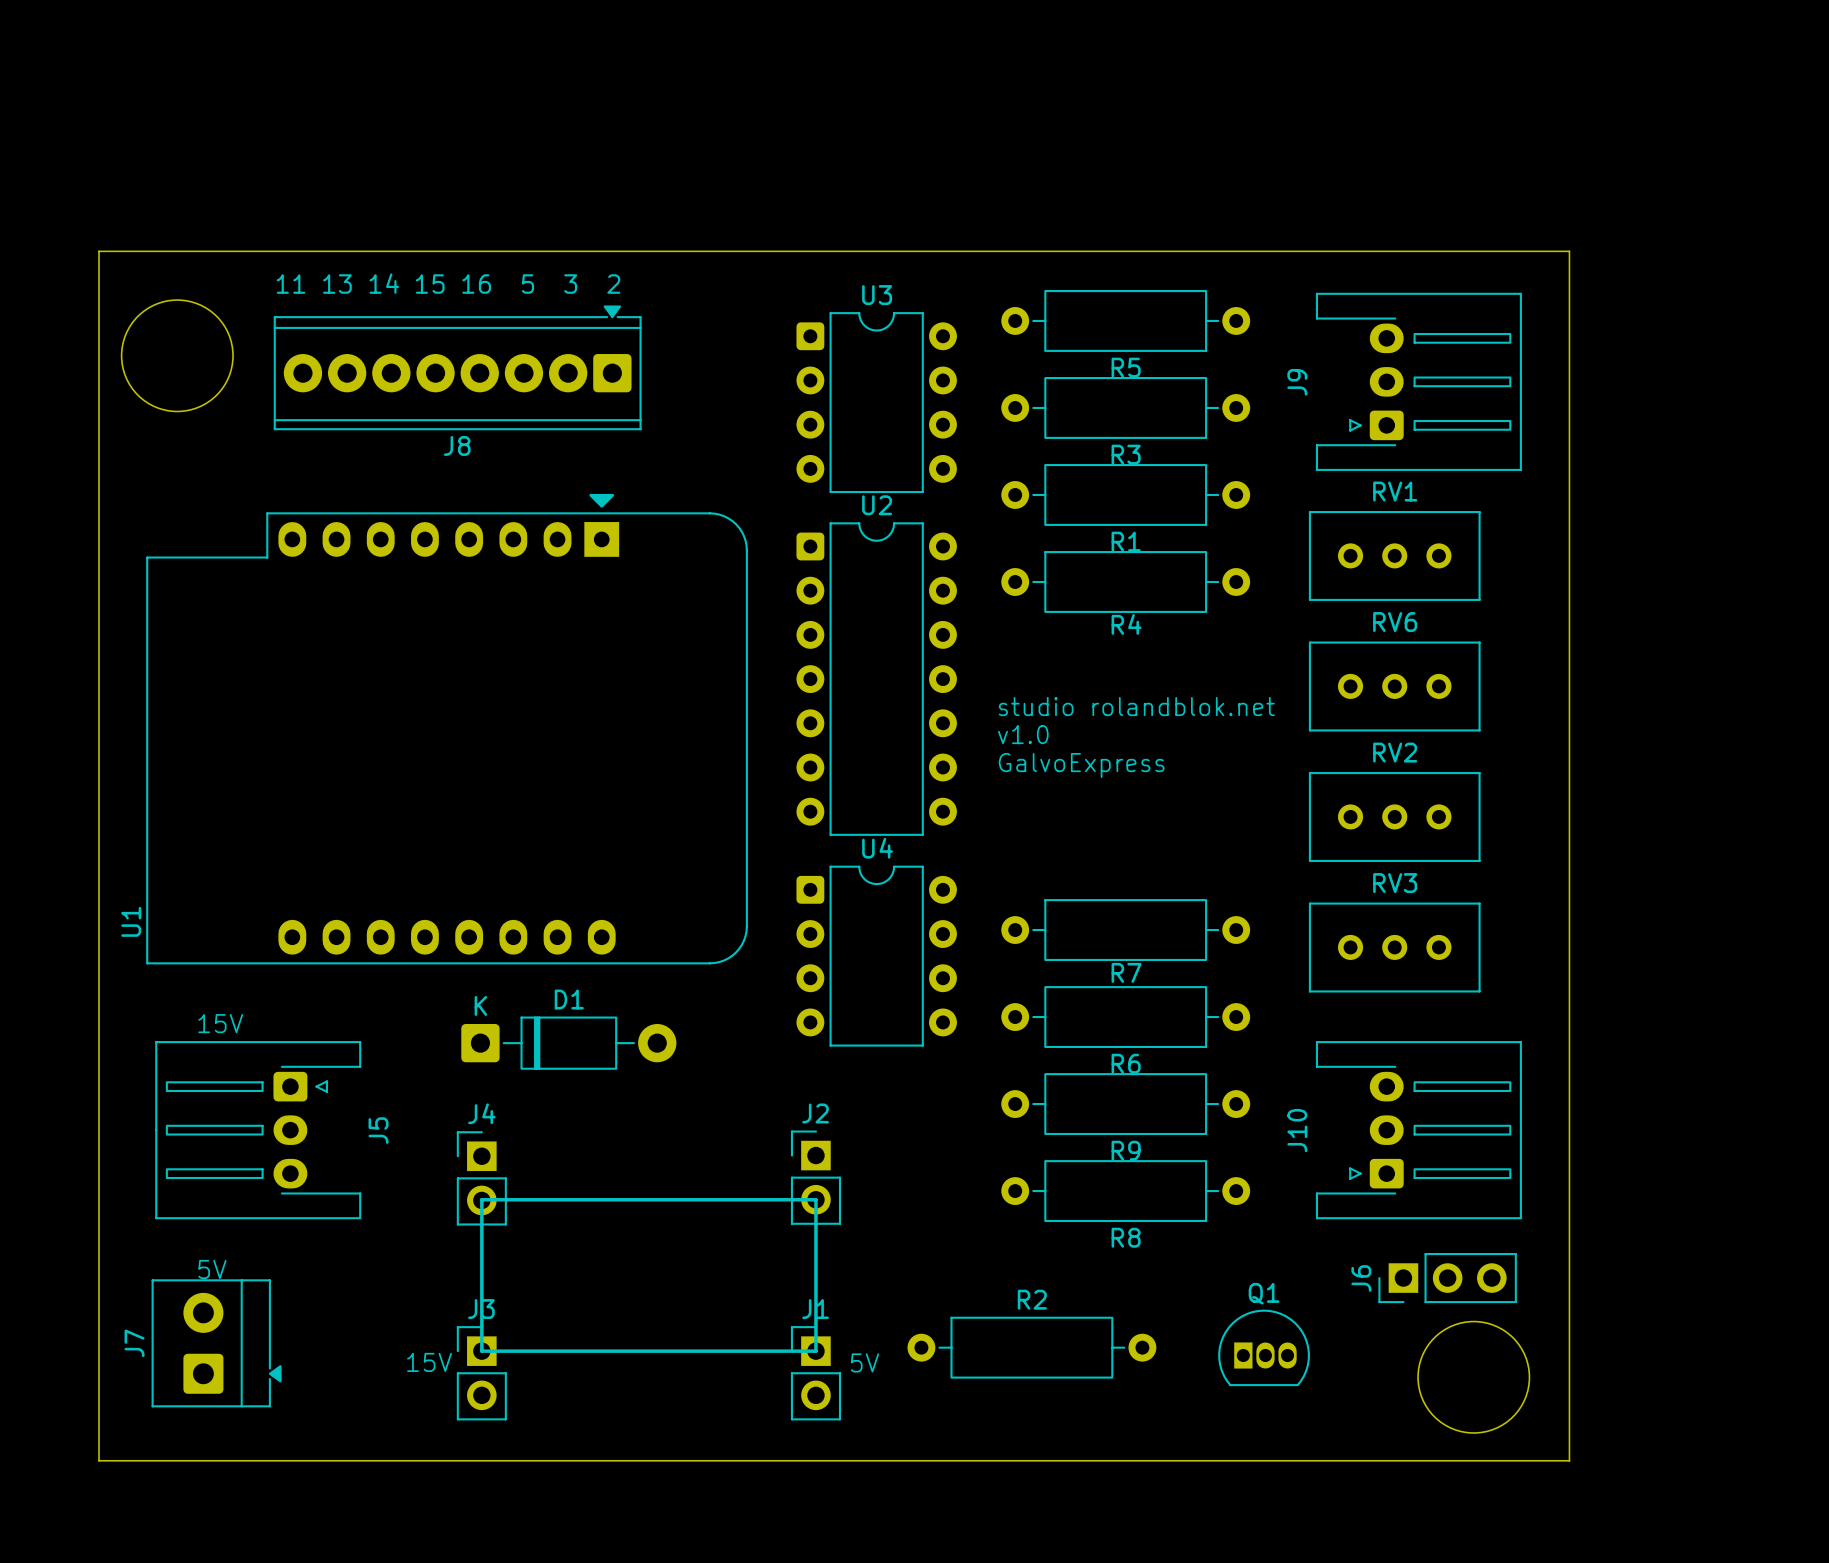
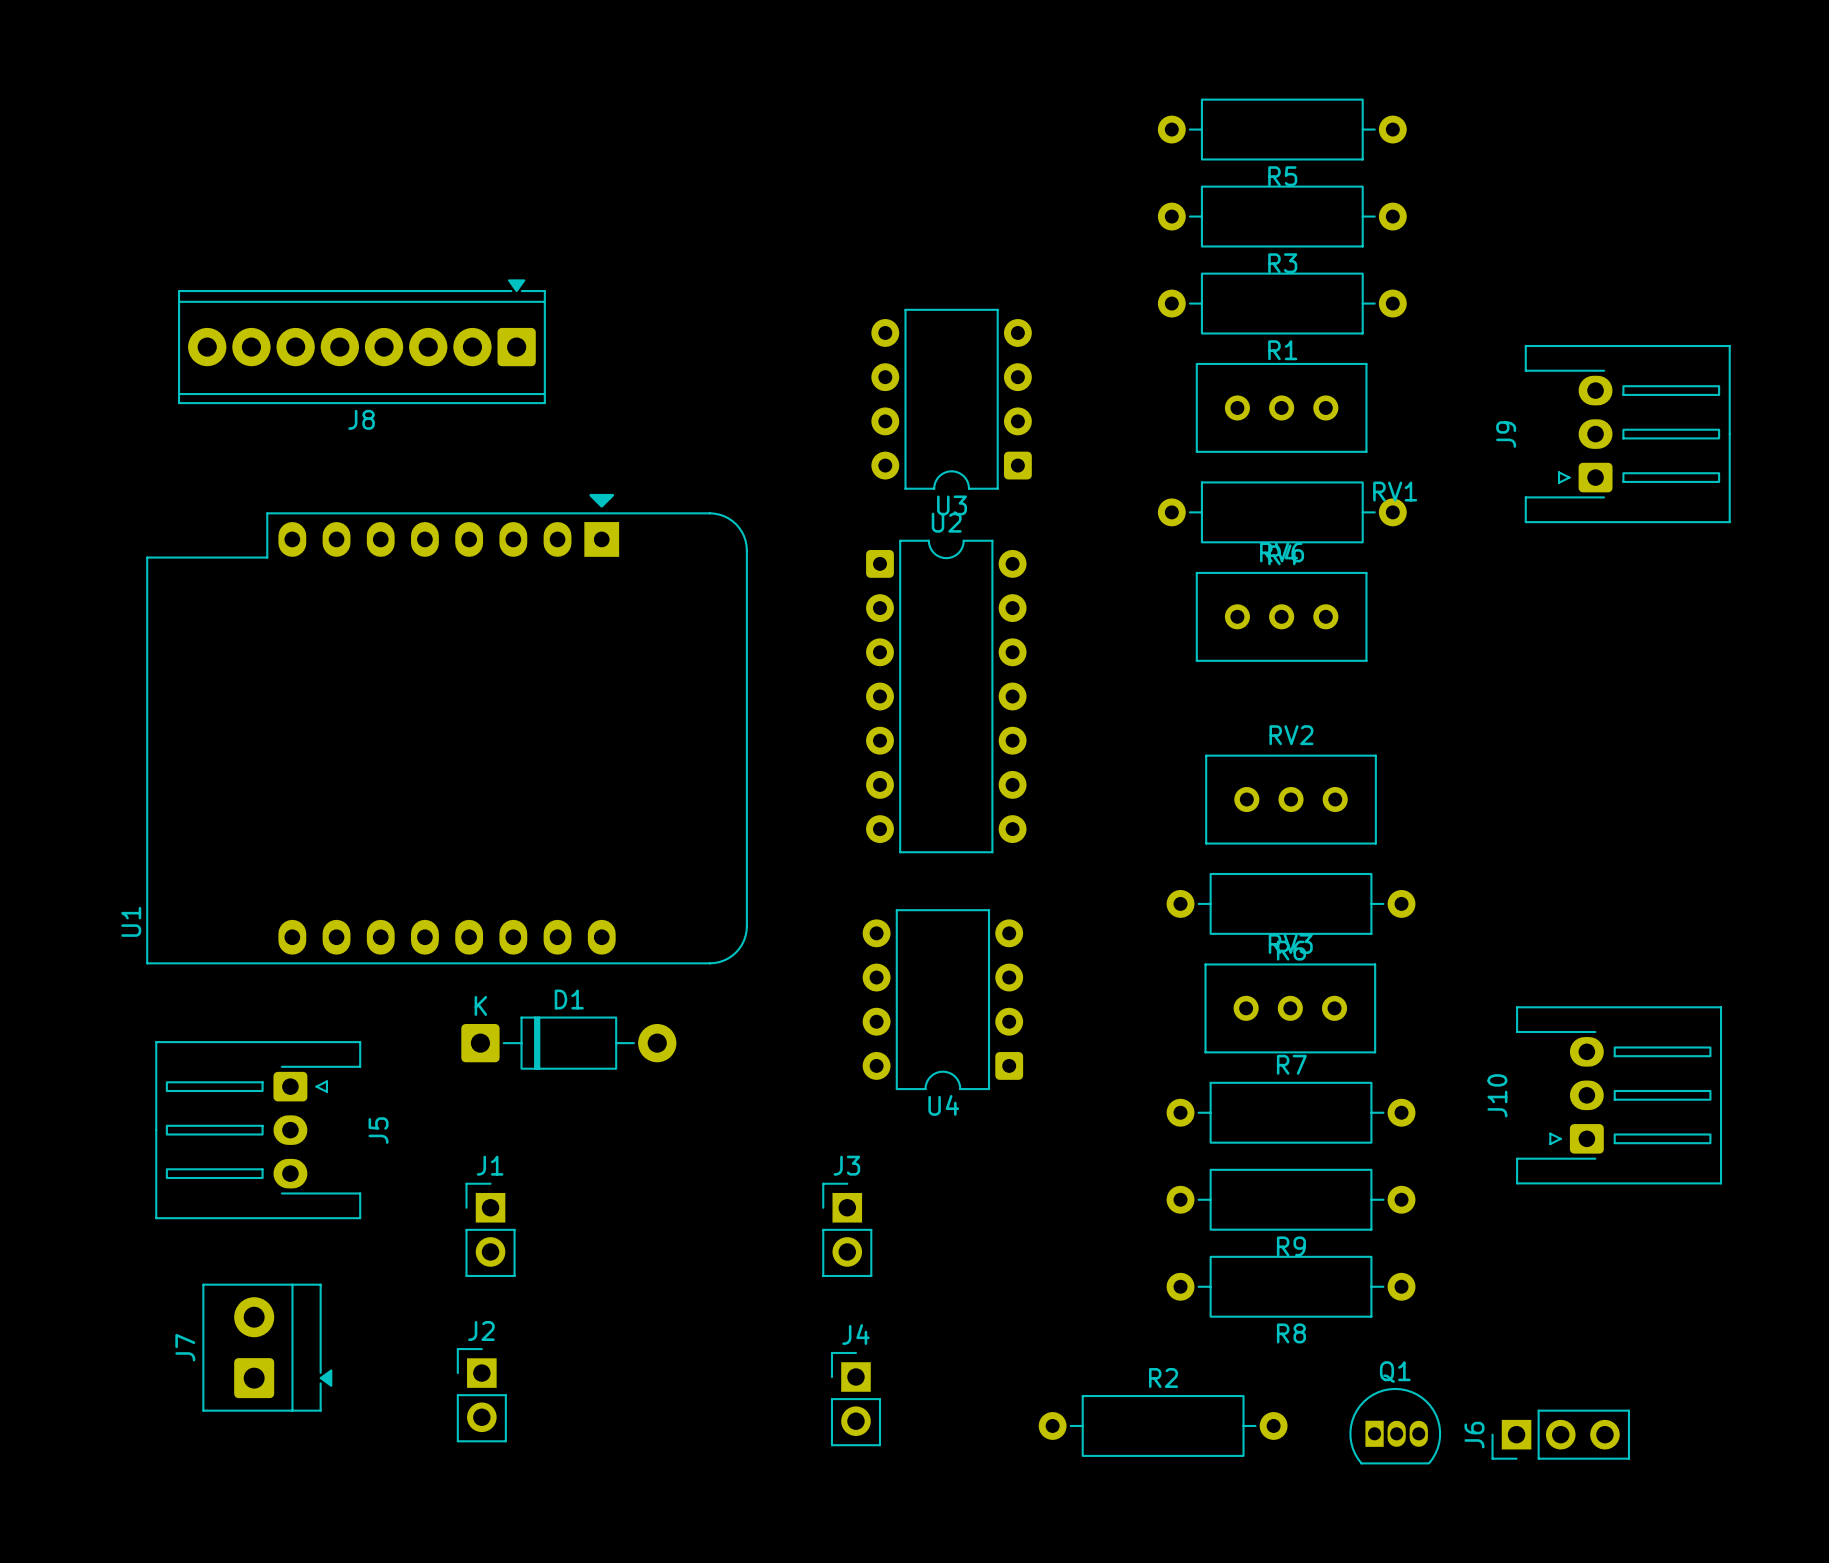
board edge: (99, 251) (1569, 251) (1569, 1460) (99, 1460) (99, 251) -> none
text: 11 13 14 15 16 5 3 2 (448, 283) -> none
round board edge: [121, 299, 234, 412] -> none
R5 position: (1125, 320) -> (1282, 129)
J8 position: (457, 367) -> (361, 341)
J9 position: (1418, 381) -> (1627, 434)
U3 rotation: 0° (876, 402) -> 180° (951, 399)
R3 position: (1125, 407) -> (1282, 216)
R1 position: (1125, 494) -> (1282, 303)
RV1 position: (1394, 555) -> (1281, 407)
R4 position: (1125, 581) -> (1282, 512)
U2 position: (876, 679) -> (946, 696)
RV6 position: (1394, 686) -> (1281, 616)
text: studio rolandblok.net (1136, 706) -> none
text: v1.0 (1023, 734) -> none
text: GalvoExpress (1081, 765) -> none
RV2 position: (1394, 817) -> (1291, 799)
R7 position: (1125, 930) -> (1291, 1112)
RV3 position: (1394, 947) -> (1290, 1008)
U4 rotation: 0° (876, 956) -> 180° (942, 999)
R7 name position: R7 (1126, 972) -> R7 (1291, 1064)
R6 position: (1125, 1017) -> (1291, 903)
text: 15V (220, 1023) -> none
R9 position: (1125, 1104) -> (1291, 1199)
J10 position: (1418, 1130) -> (1619, 1095)
J2 position: (815, 1177) -> (481, 1395)
J4 position: (481, 1178) -> (855, 1399)
R8 position: (1125, 1191) -> (1291, 1286)
line: (481, 1199) (815, 1199) (815, 1351) (481, 1351) (481, 1199) -> none
text: 5V (212, 1269) -> none
J6 position: (1447, 1278) -> (1560, 1434)
round board edge: [1417, 1321, 1530, 1434] -> none
J7 position: (216, 1343) -> (267, 1347)
R2 position: (1031, 1347) -> (1163, 1425)
Q1 position: (1264, 1347) -> (1395, 1426)
text: 15V (429, 1362) -> none
text: 5V (865, 1362) -> none
J3 position: (481, 1373) -> (847, 1229)
J1 position: (815, 1373) -> (490, 1229)

